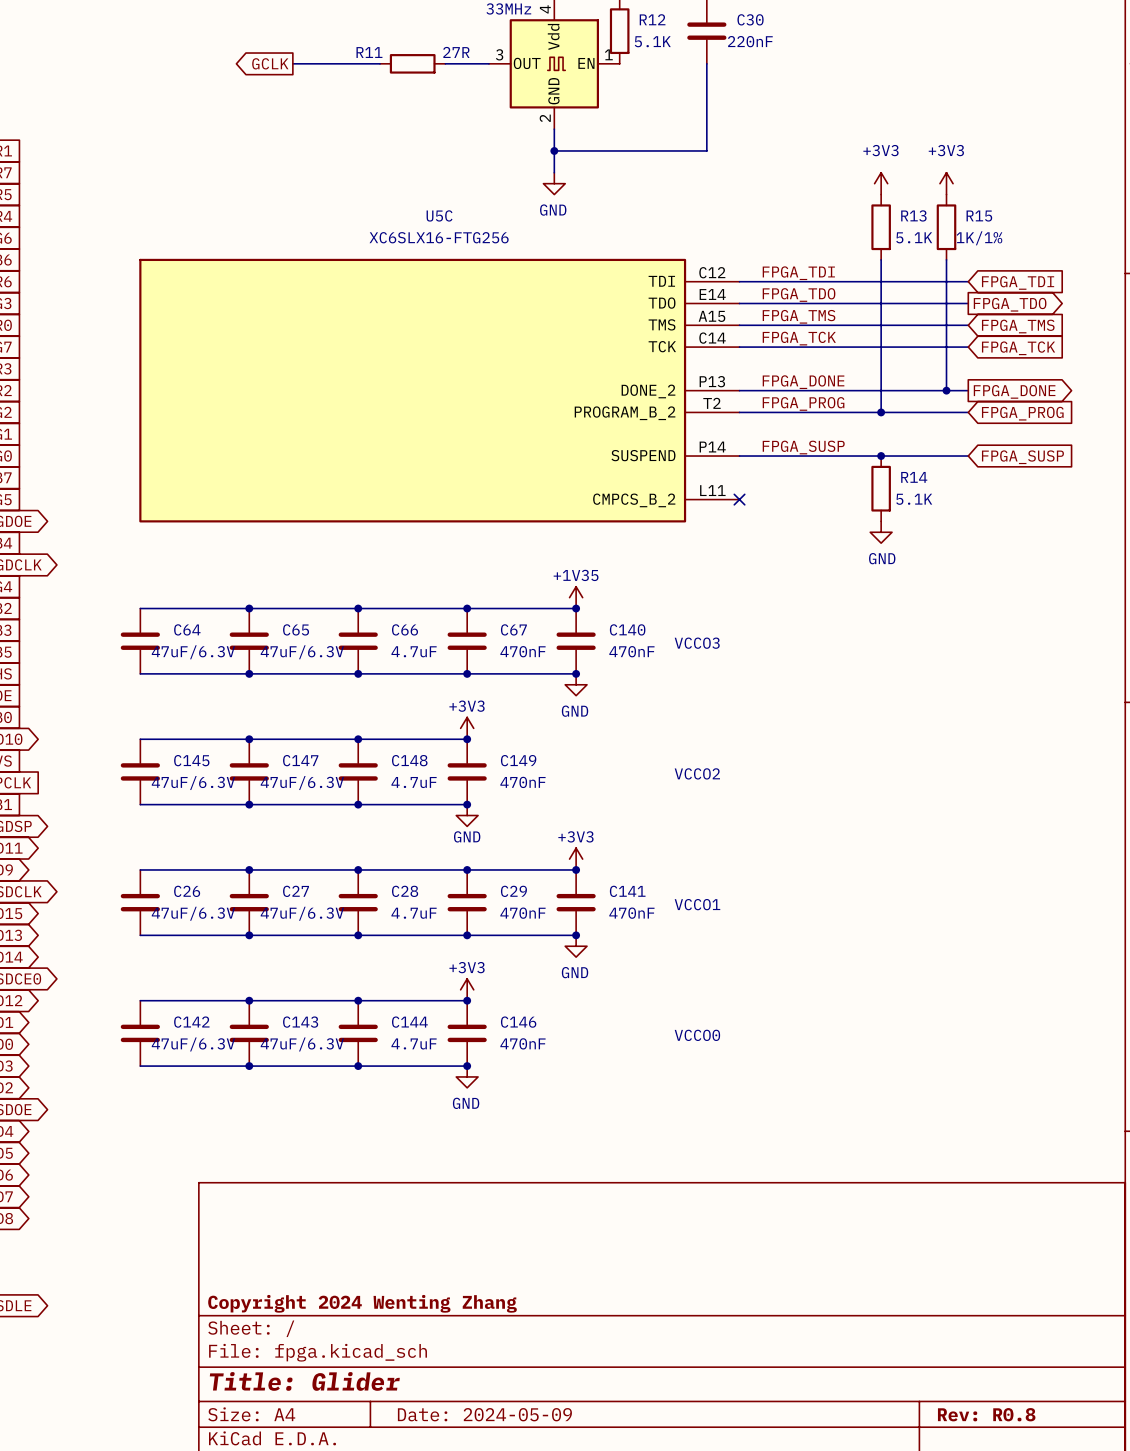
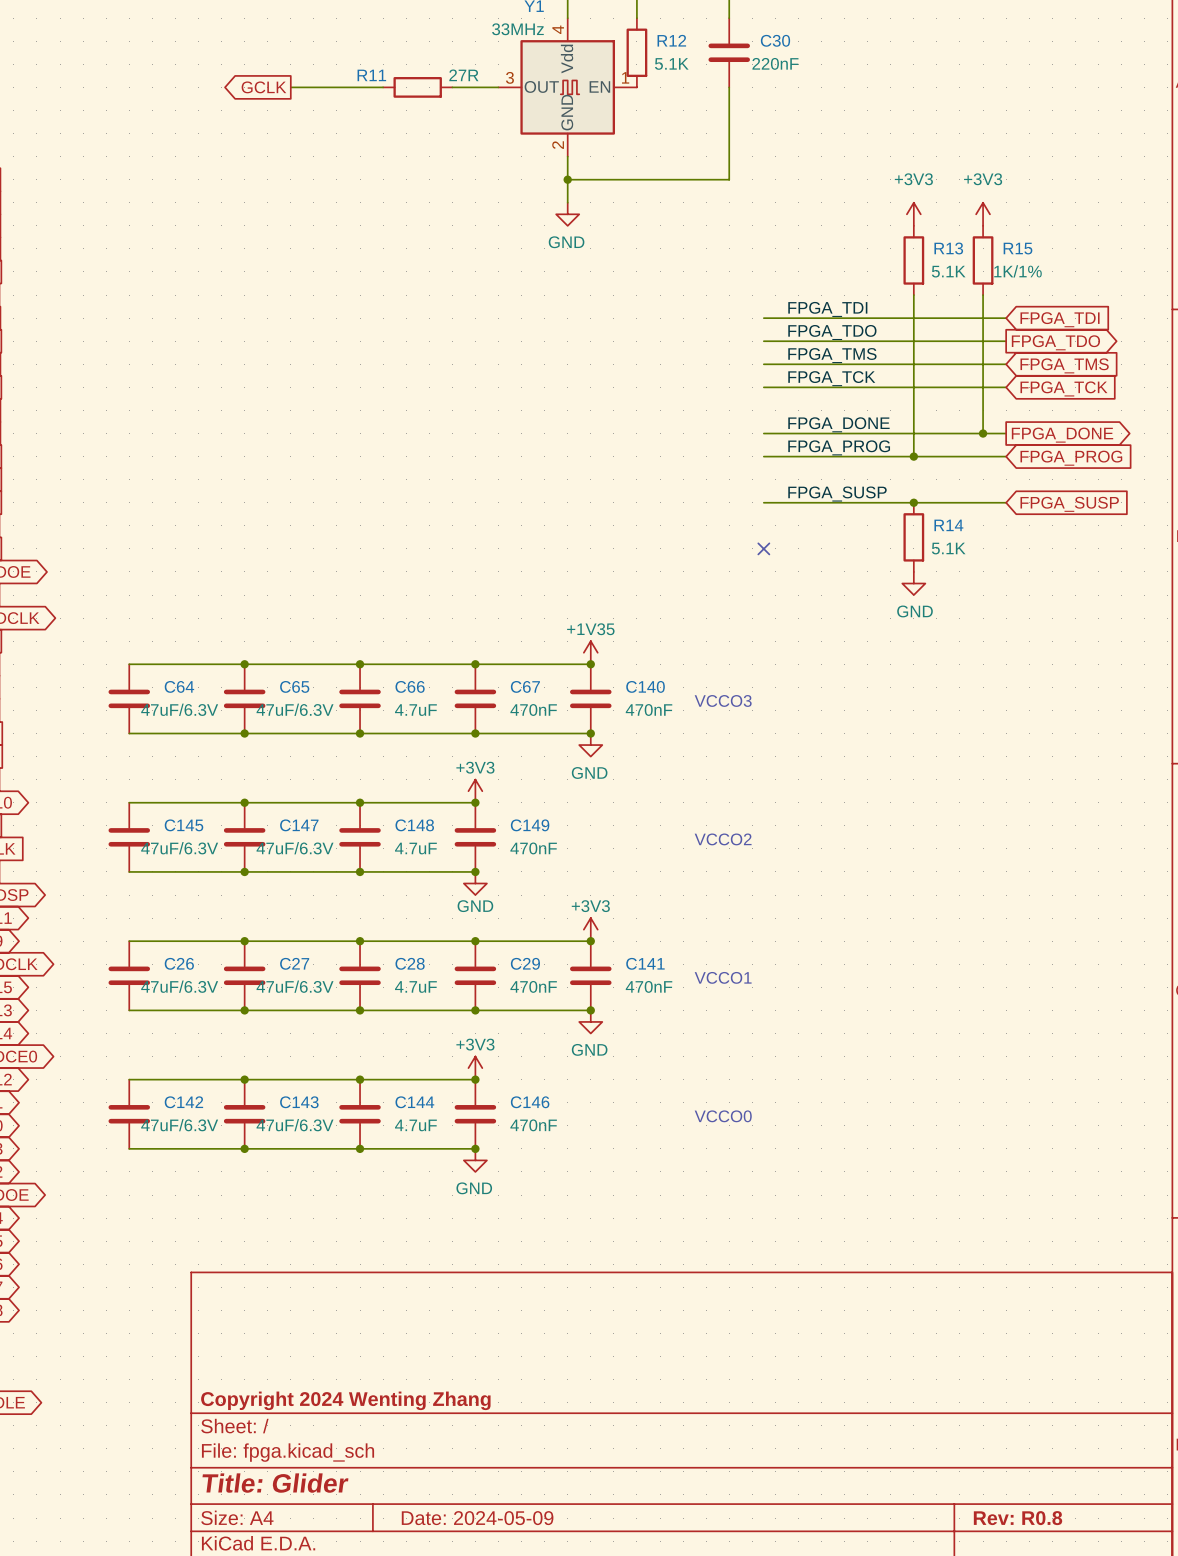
U5C: XC6SLX16-FTG256 (439, 390) -> none

